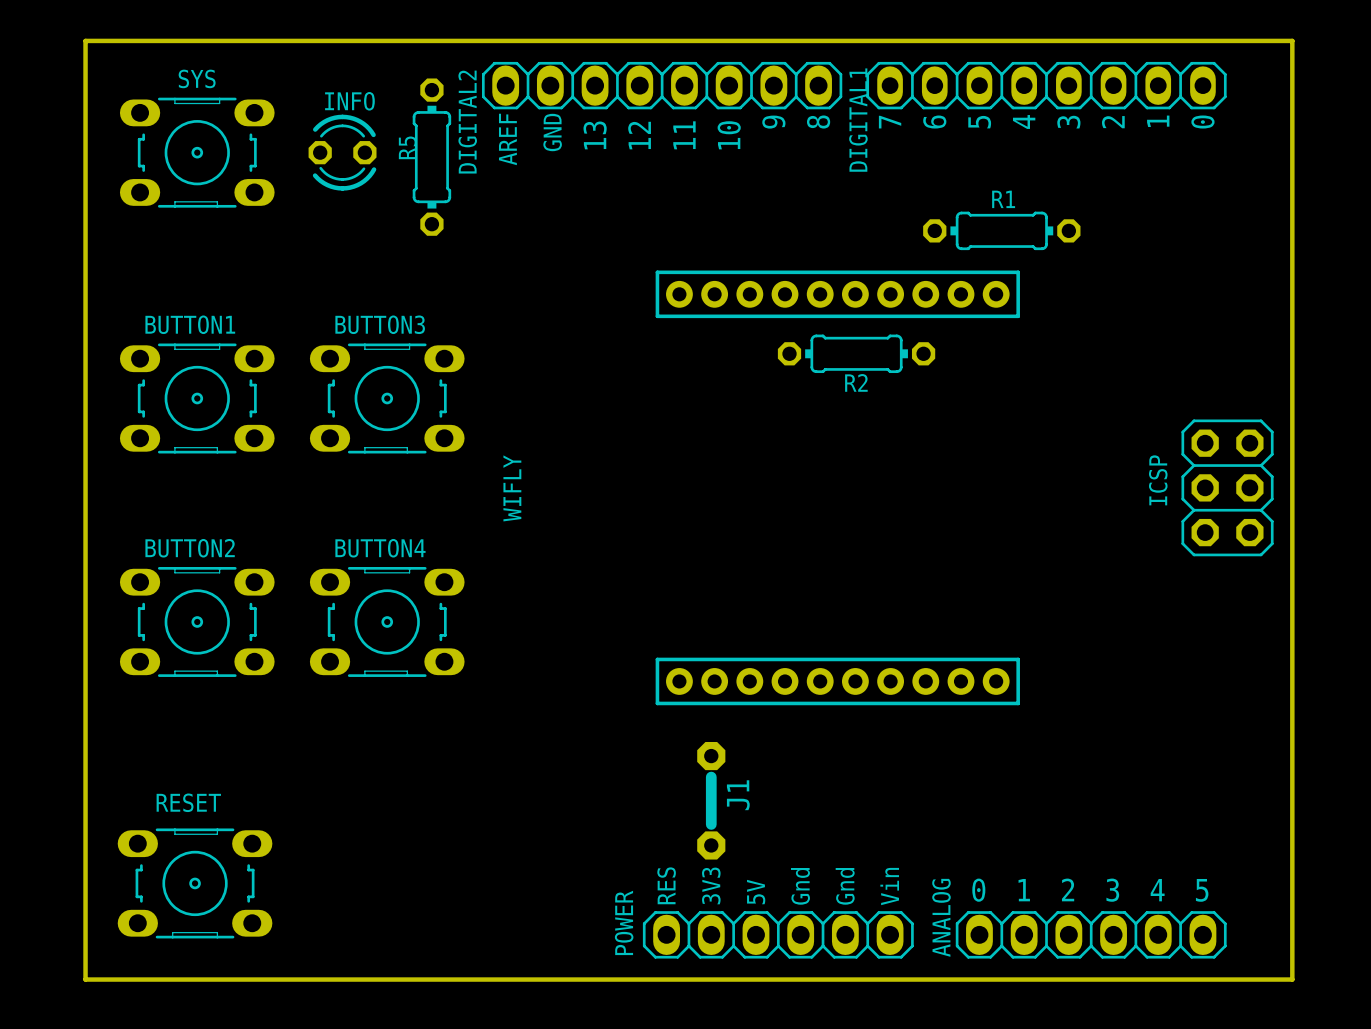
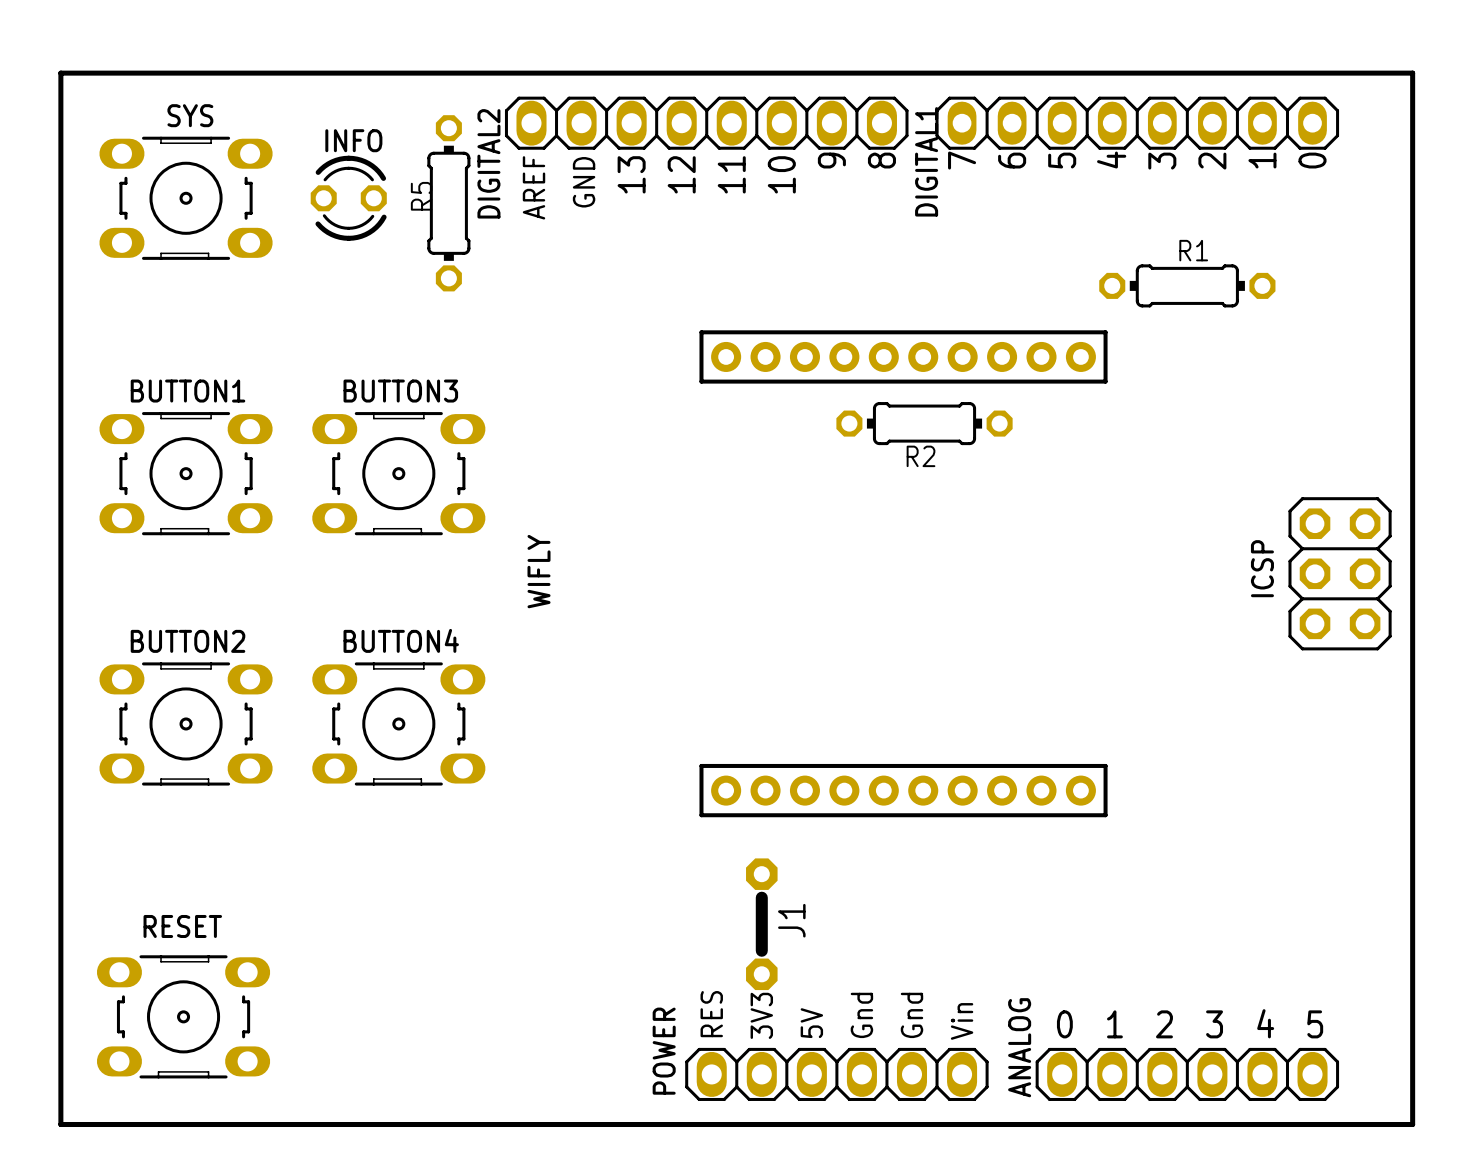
R1 position: (1001, 230) -> (1187, 285)

